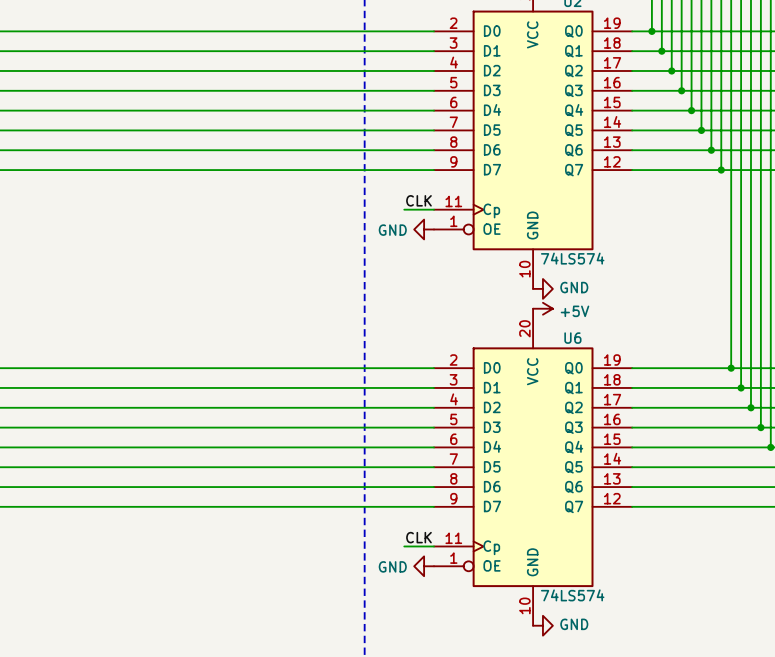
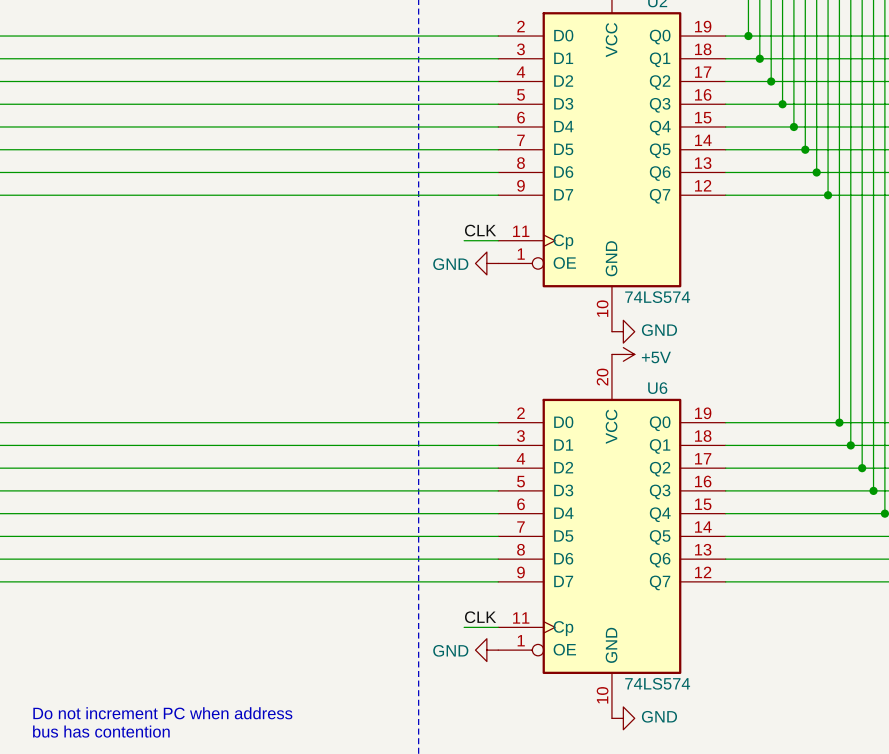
text: none -> Do not increment PC when address (162, 713)
text: none -> bus has contention (101, 731)

